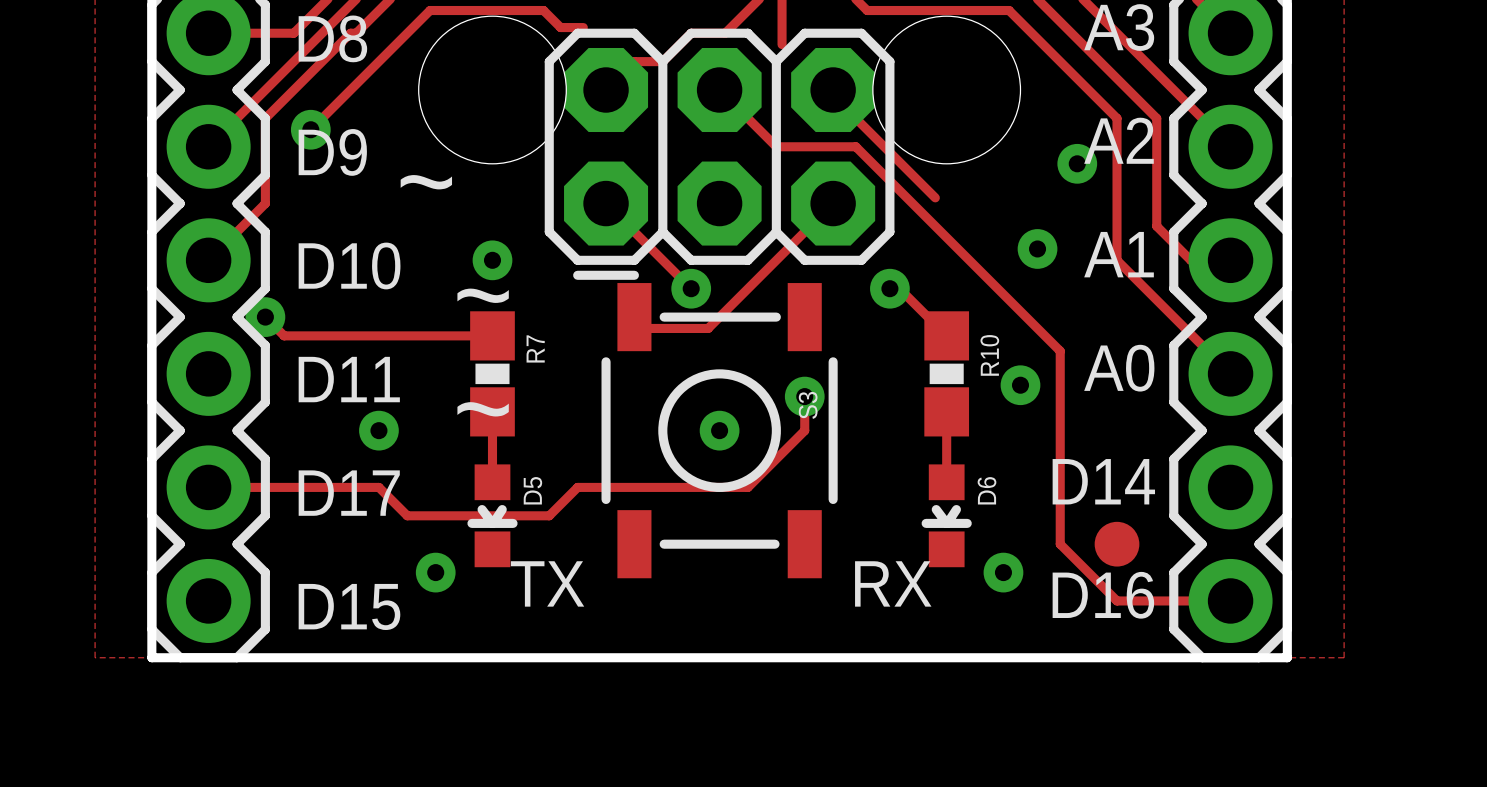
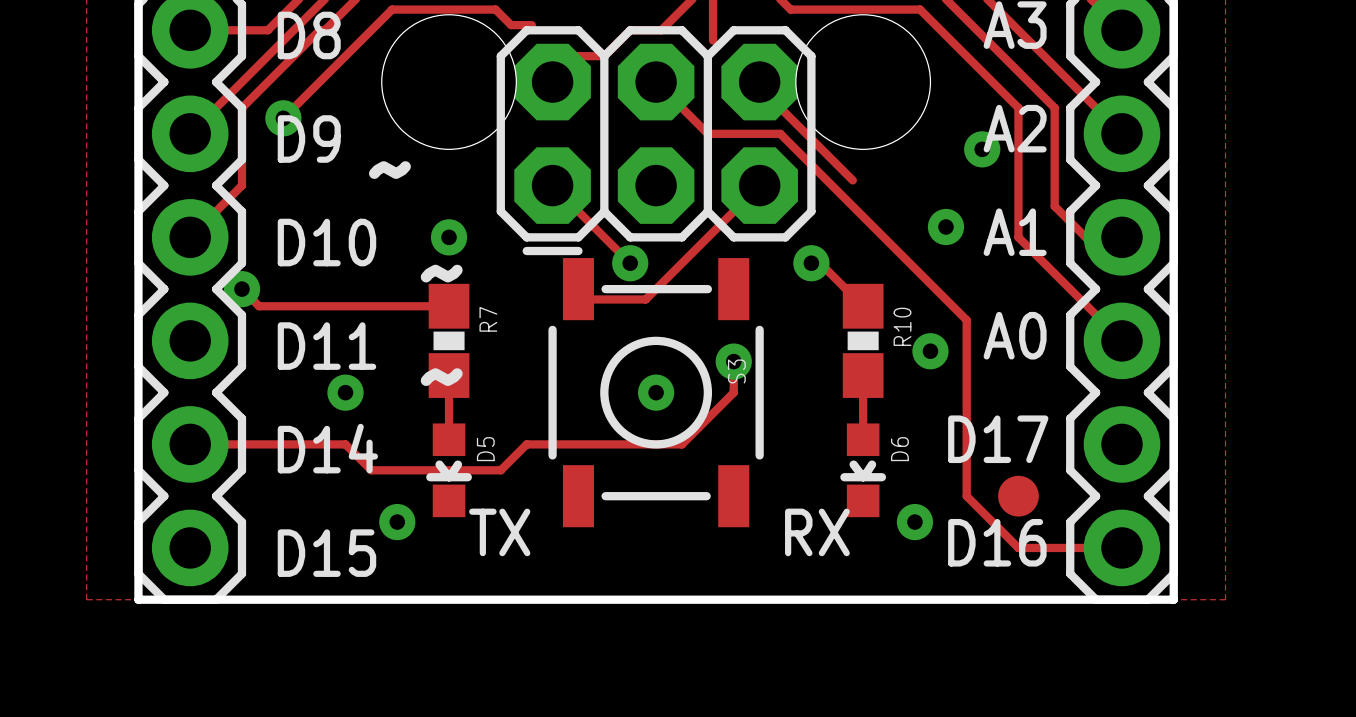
text: D14 (1103, 481) -> D17 (998, 439)
text: D17 (349, 493) -> D14 (327, 448)

